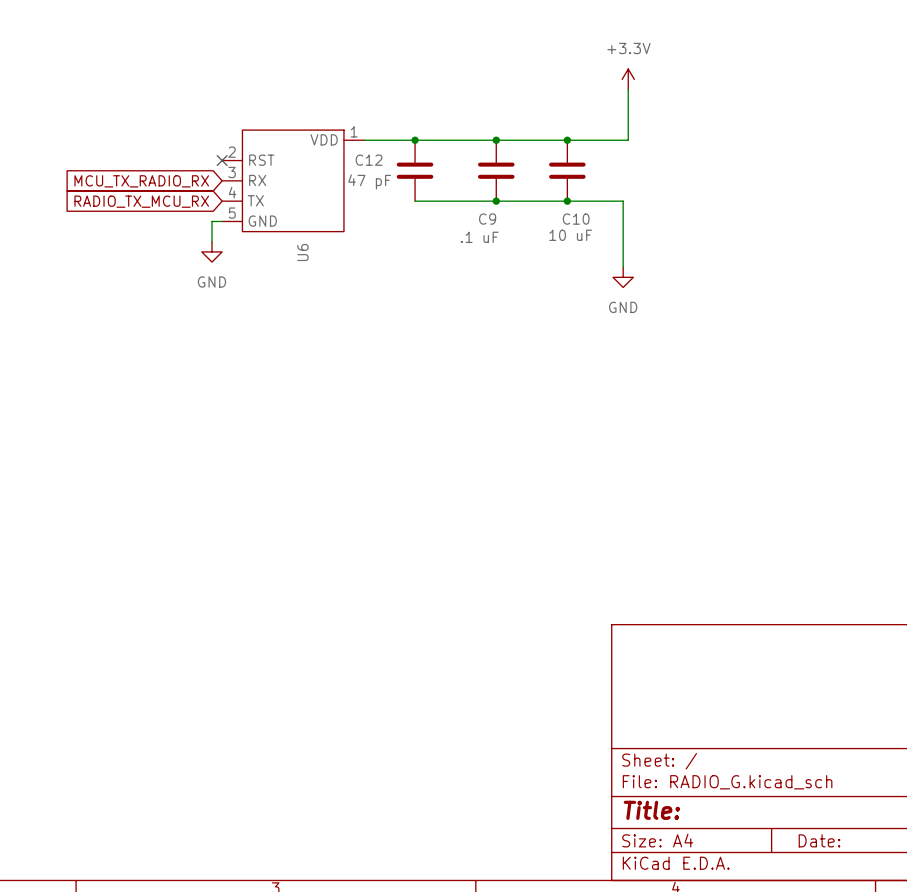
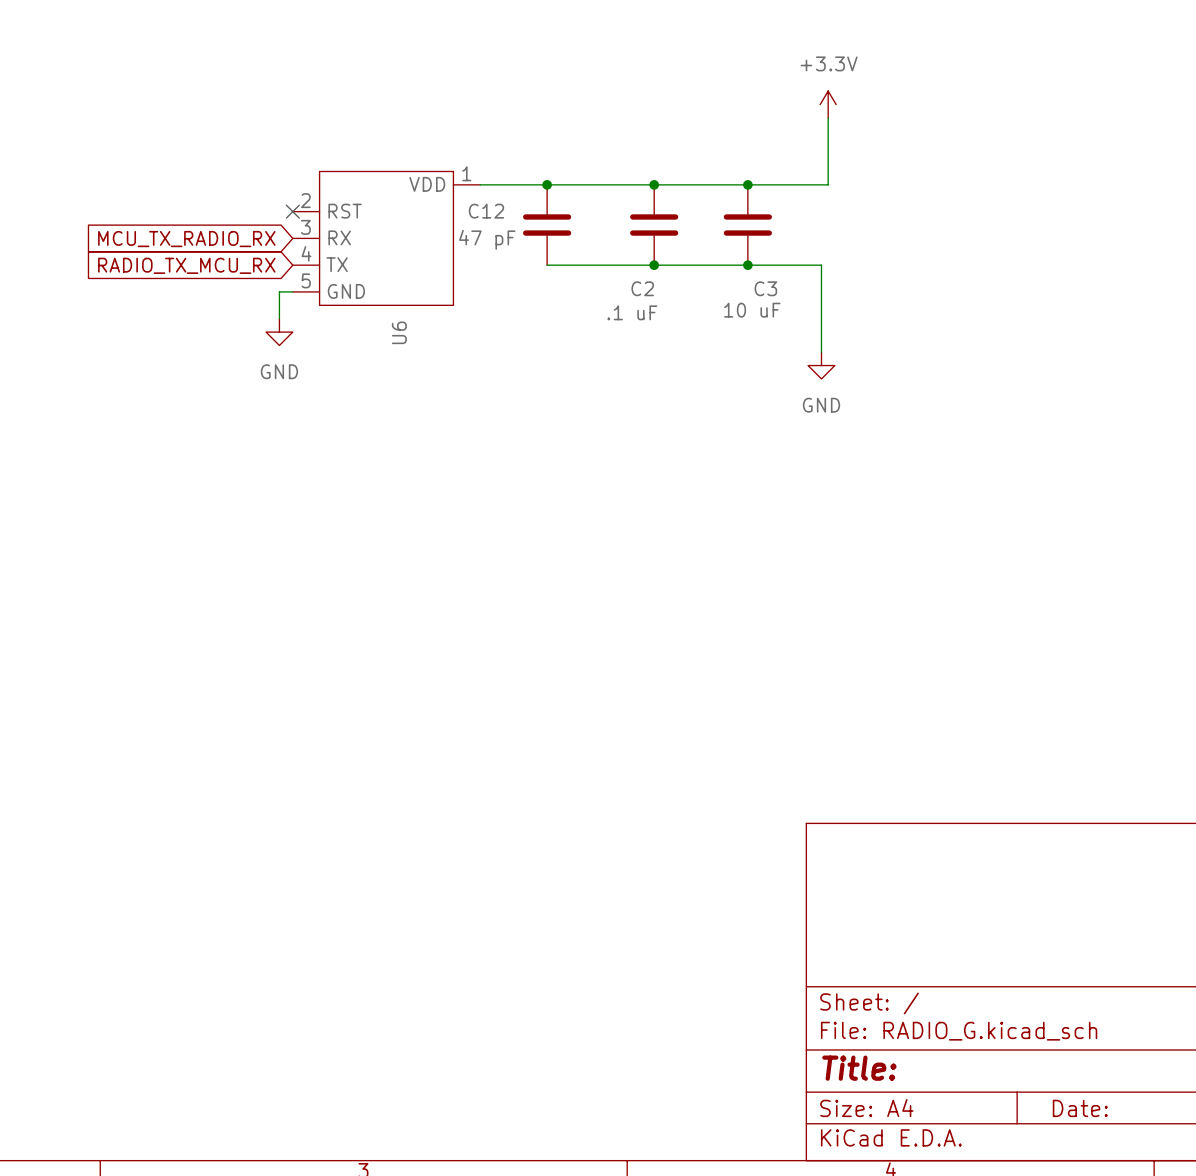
C9 name: C9 (487, 219) -> C2 (642, 288)
C10 name: C10 (576, 219) -> C3 (765, 288)

